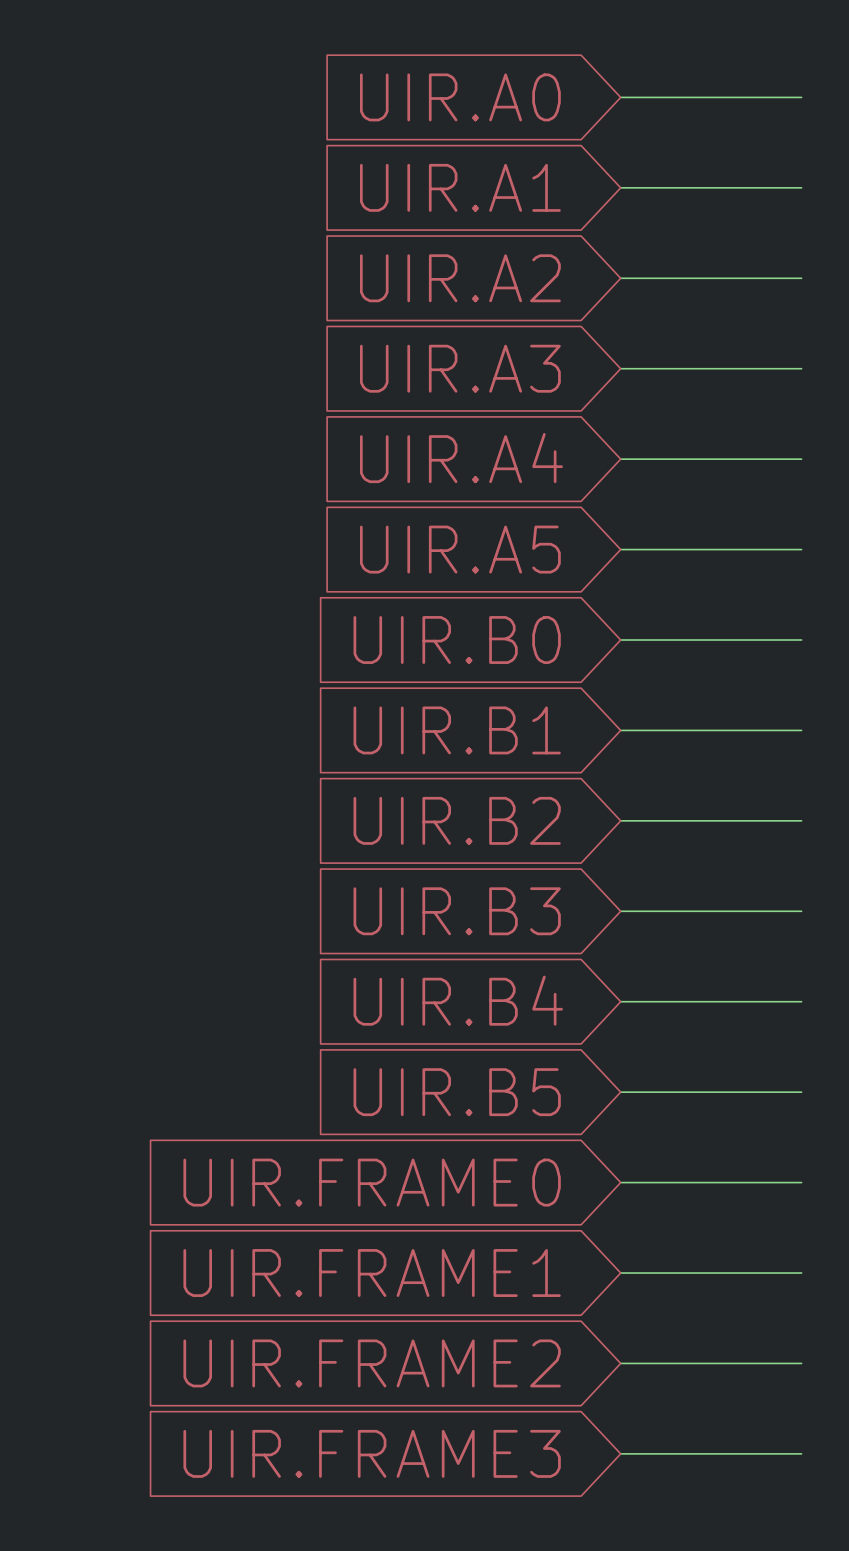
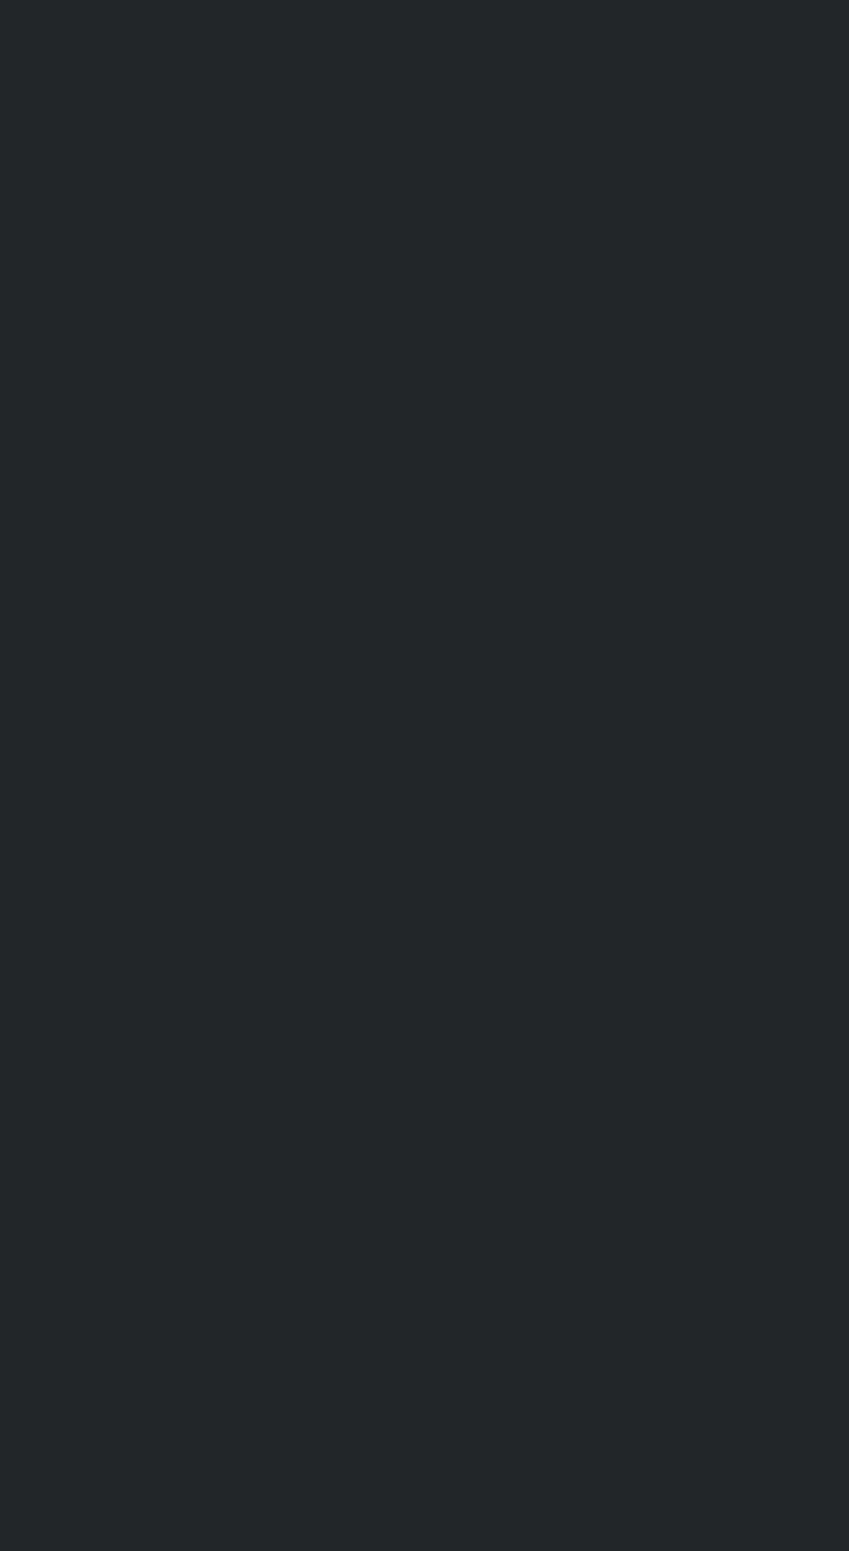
global label: UIR.A0 (460, 97) -> none
wire: (620, 97) (801, 97) -> none
global label: UIR.A1 (460, 187) -> none
wire: (620, 187) (801, 187) -> none
global label: UIR.A2 (460, 278) -> none
wire: (620, 278) (801, 278) -> none
global label: UIR.A3 (460, 368) -> none
wire: (620, 368) (801, 368) -> none
global label: UIR.A4 (461, 458) -> none
wire: (620, 459) (801, 459) -> none
global label: UIR.A5 (460, 549) -> none
wire: (620, 549) (801, 549) -> none
global label: UIR.B0 (457, 640) -> none
wire: (620, 640) (801, 640) -> none
global label: UIR.B1 (457, 730) -> none
wire: (620, 730) (801, 730) -> none
global label: UIR.B2 (457, 820) -> none
wire: (620, 820) (801, 820) -> none
global label: UIR.B3 (457, 911) -> none
wire: (620, 911) (801, 911) -> none
global label: UIR.B4 (458, 1000) -> none
wire: (620, 1001) (801, 1001) -> none
global label: UIR.B5 (457, 1092) -> none
wire: (620, 1092) (801, 1092) -> none
global label: UIR.FRAME0 (372, 1182) -> none
wire: (620, 1182) (801, 1182) -> none
global label: UIR.FRAME1 (372, 1273) -> none
wire: (620, 1273) (801, 1273) -> none
global label: UIR.FRAME2 (372, 1363) -> none
wire: (620, 1363) (801, 1363) -> none
global label: UIR.FRAME3 (372, 1453) -> none
wire: (620, 1453) (801, 1453) -> none

